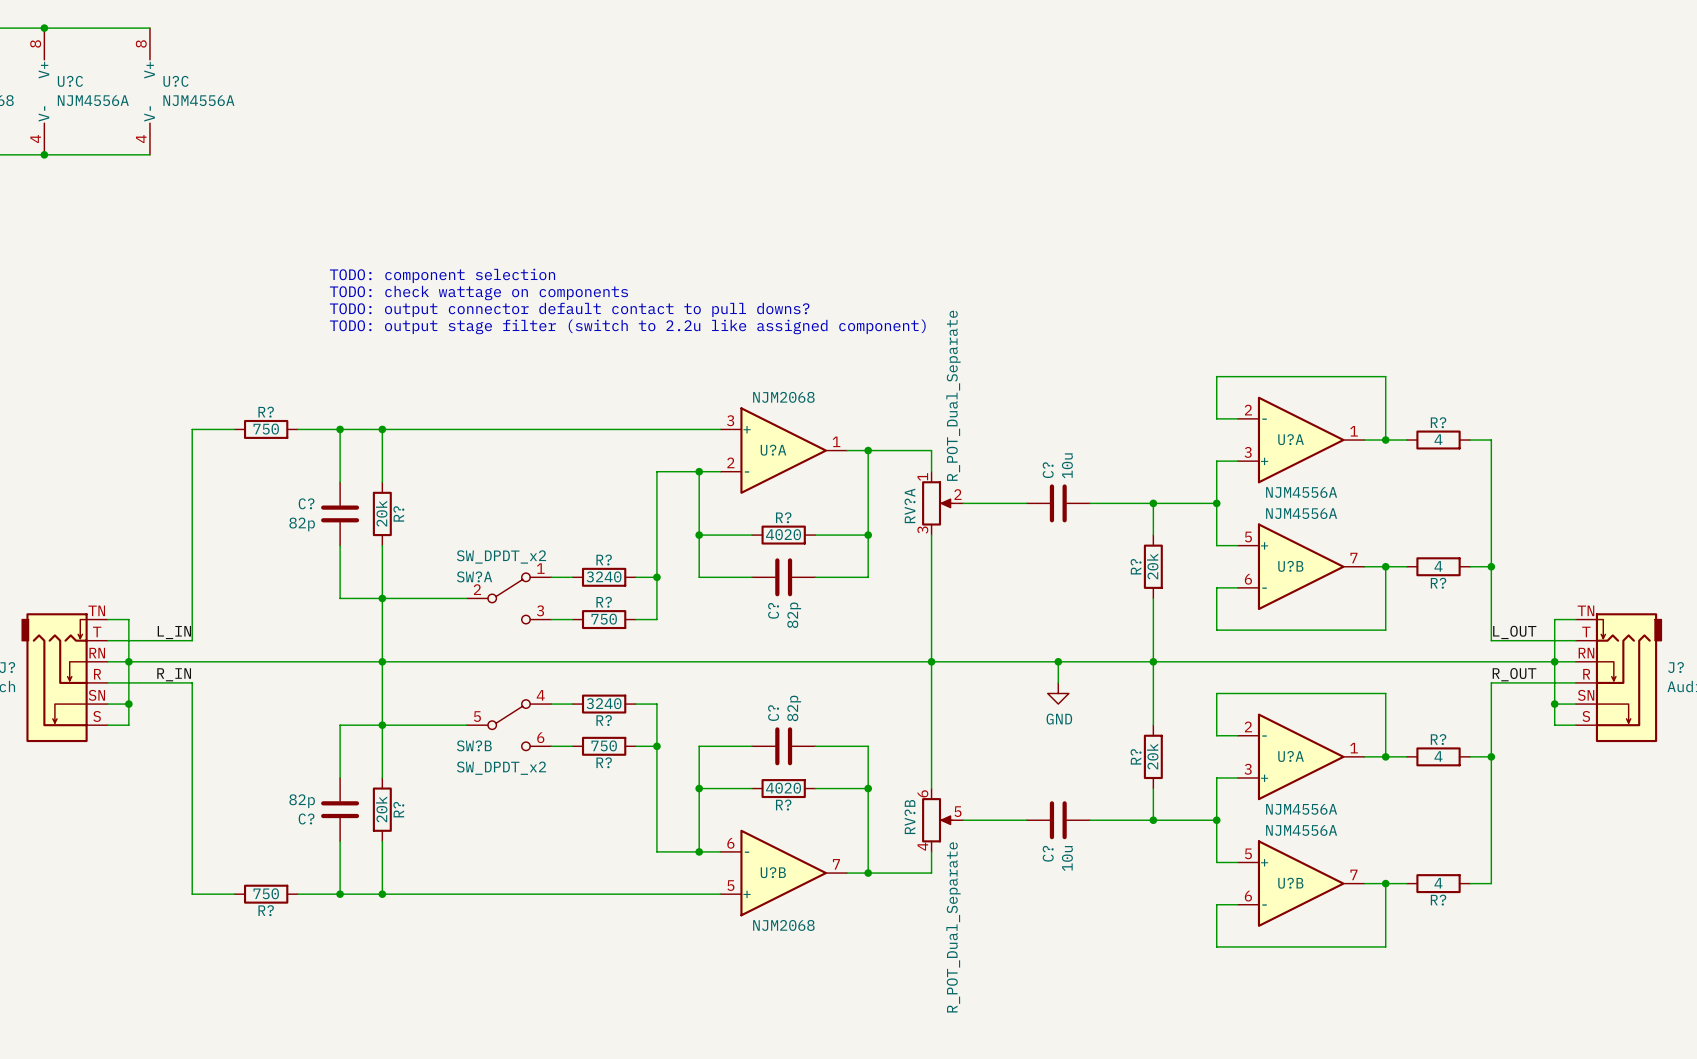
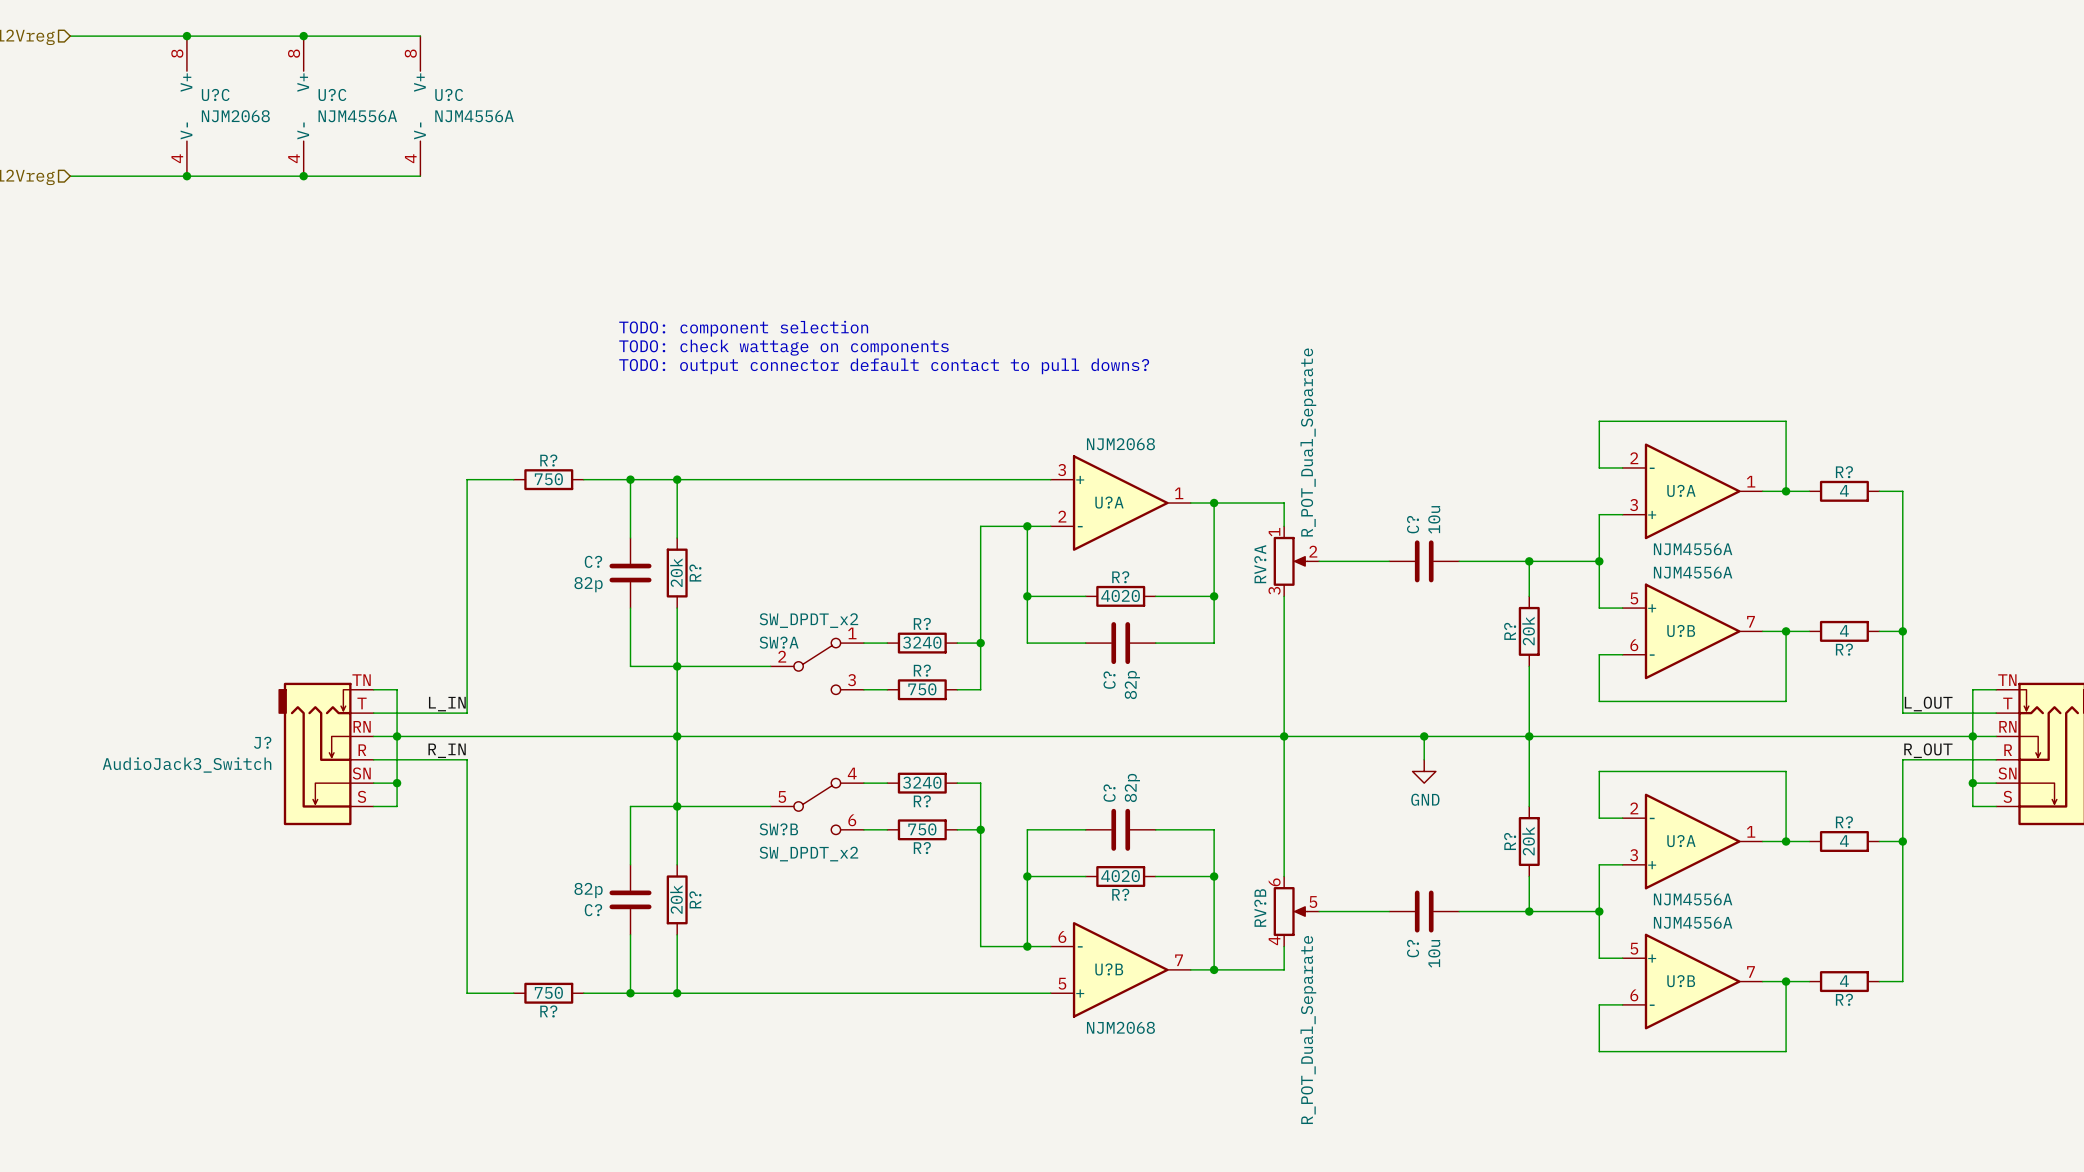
text: TODO: component selection (442, 275) -> none
text: TODO: check wattage on components (478, 293) -> TODO: component selection (743, 328)
text: TODO: output connector default contact to pull downs? (569, 309) -> TODO: check wattage on components (783, 347)
text: TODO: output stage filter (switch to 2.2u like assigned component) (627, 326) -> TODO: output connector default contact to pull downs? (884, 366)

